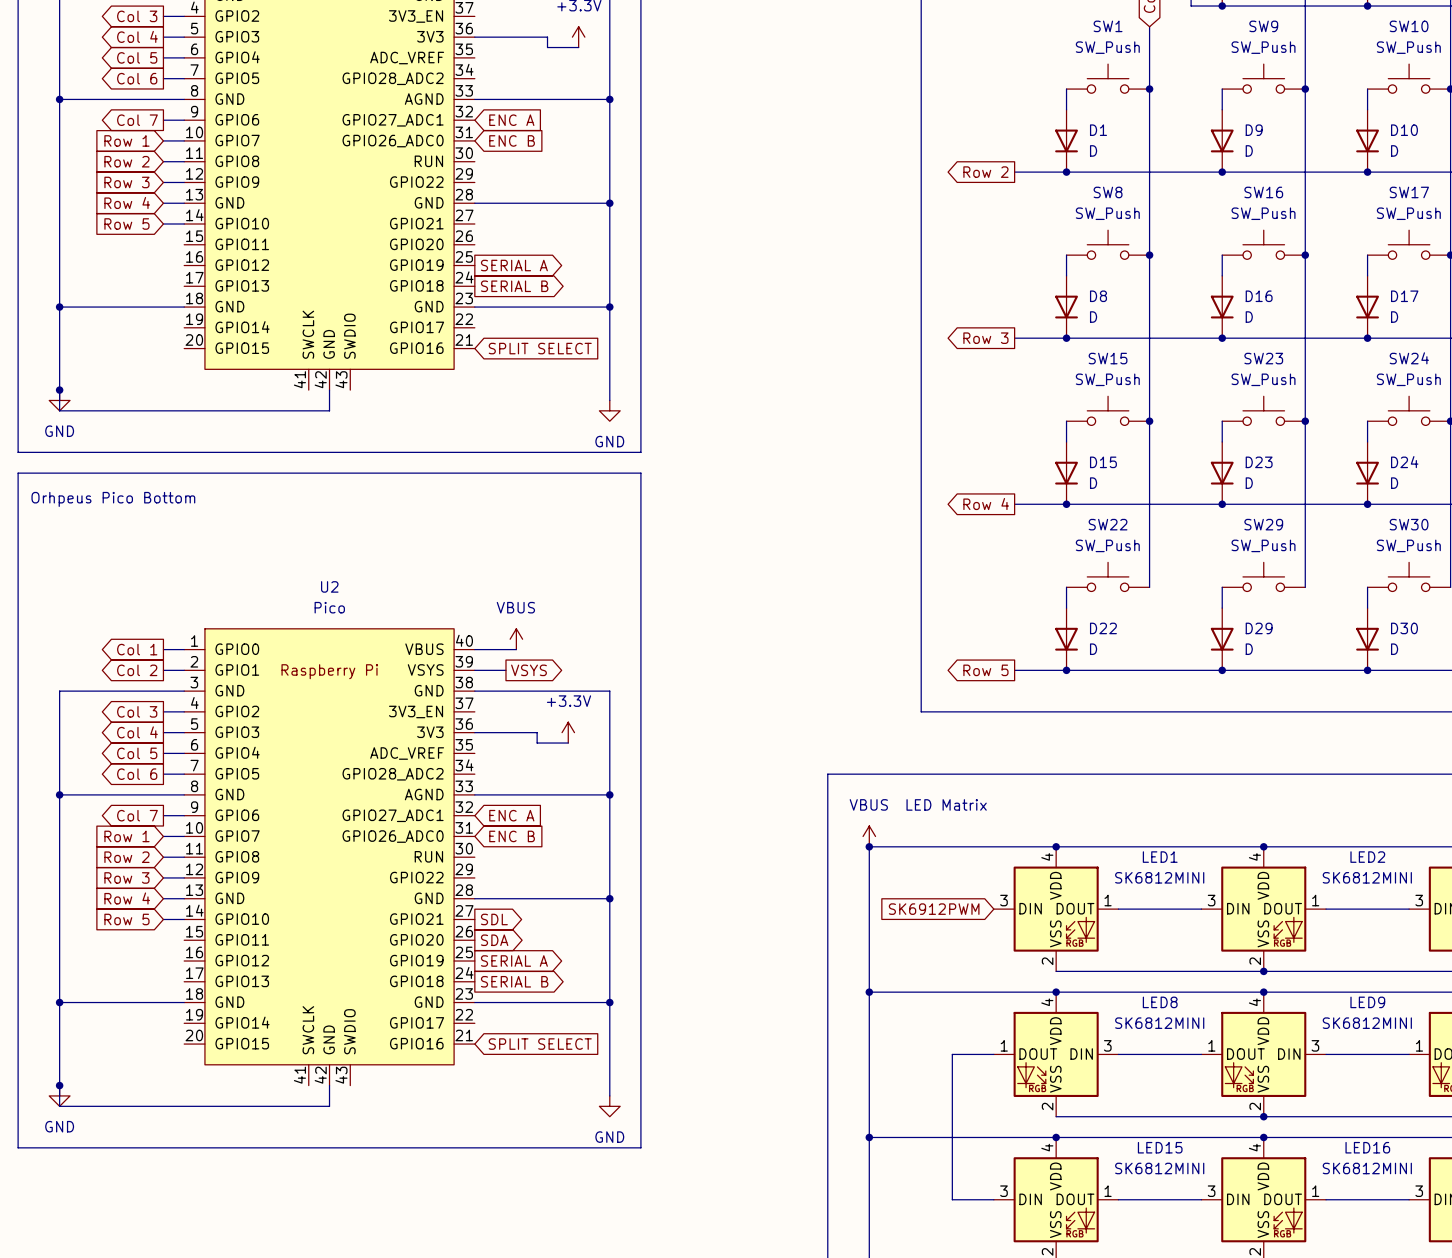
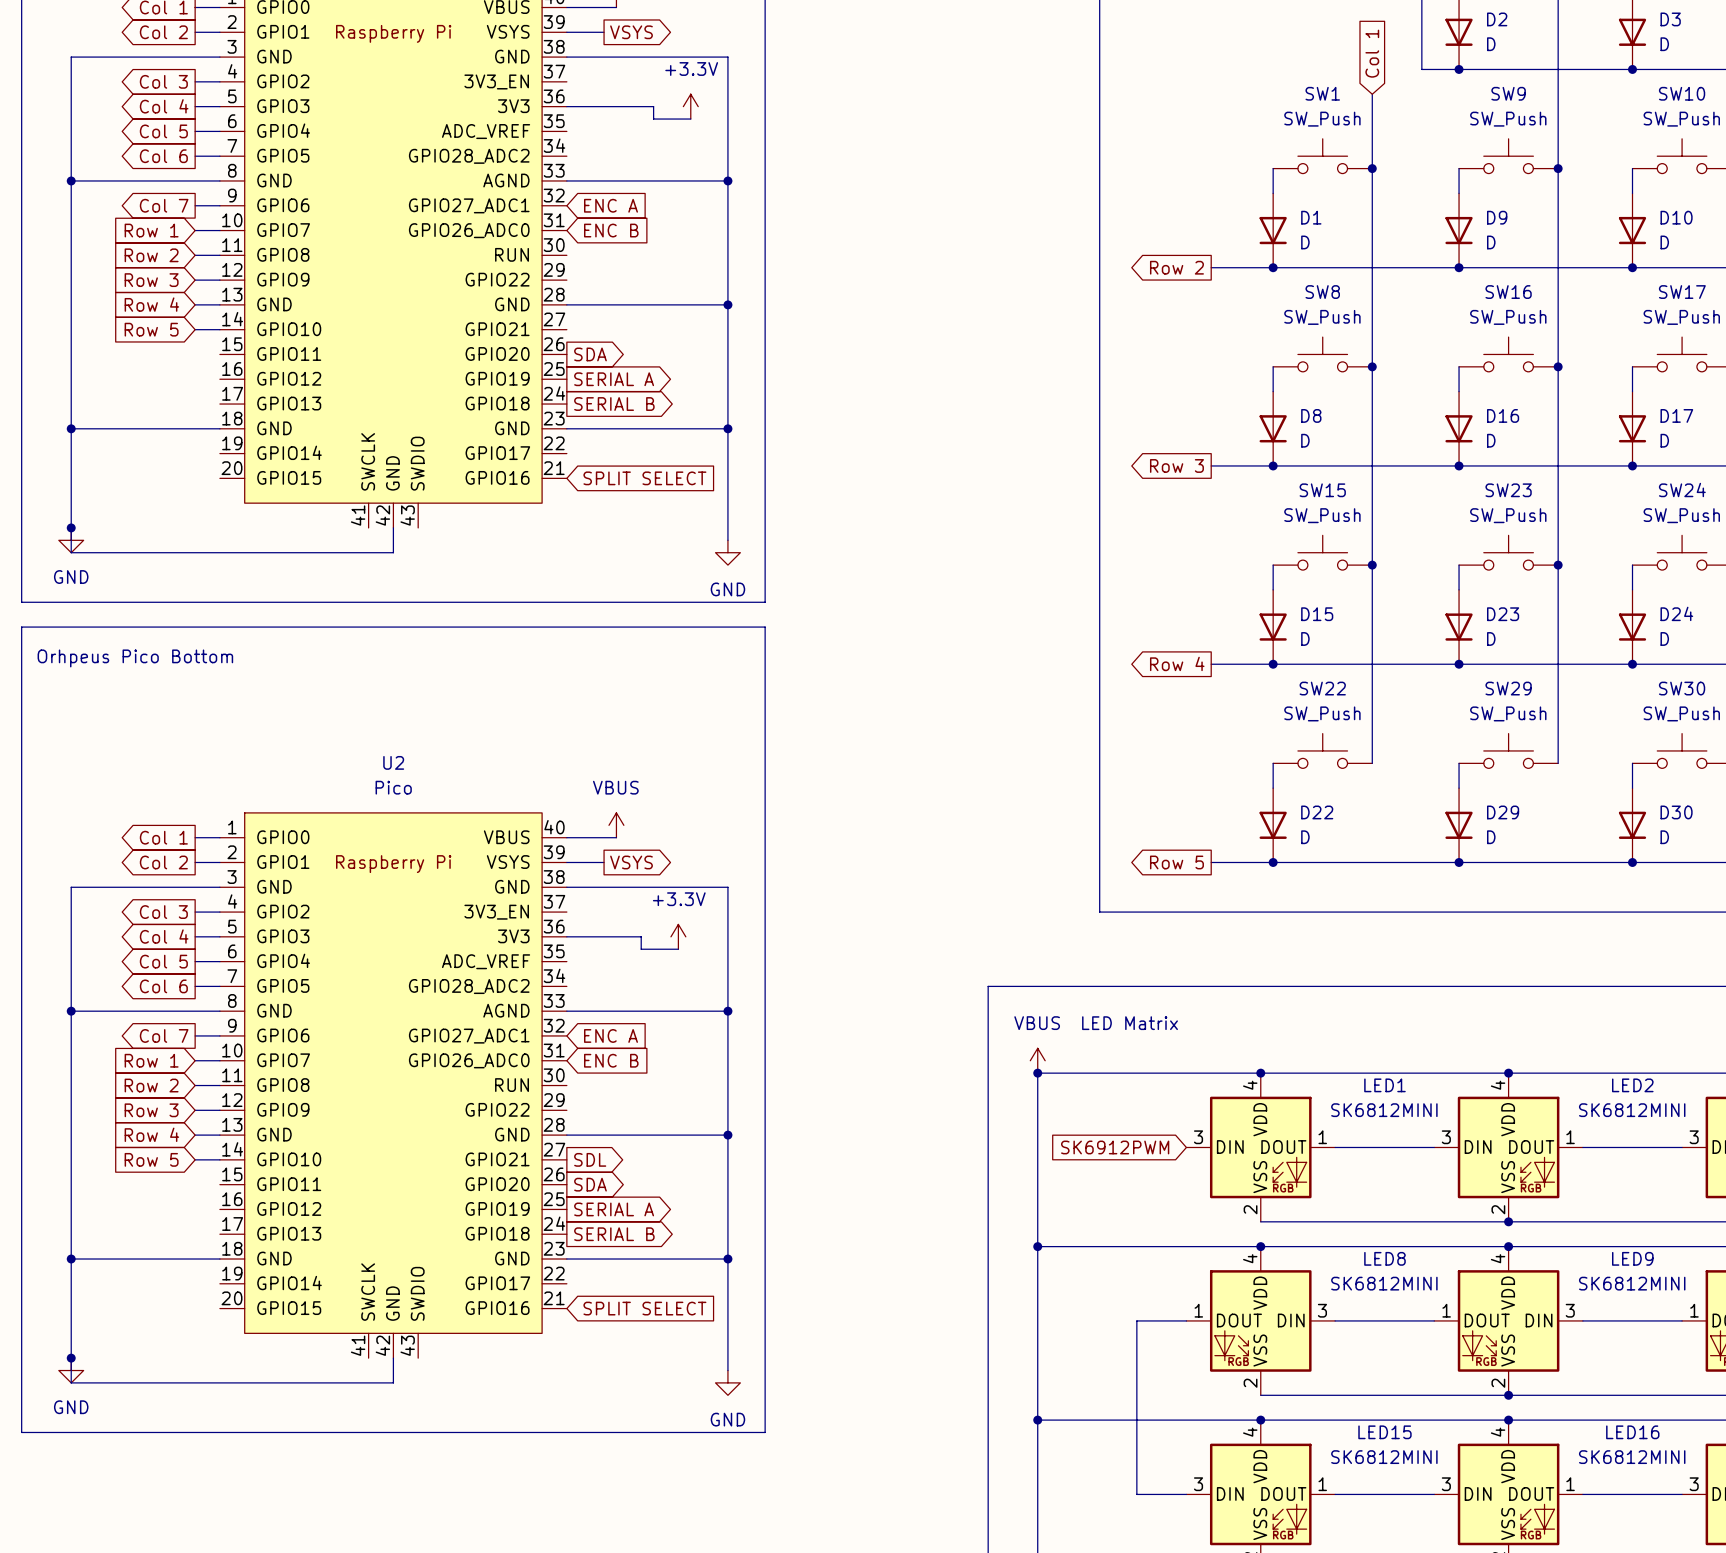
global label: none -> SDA (590, 354)

